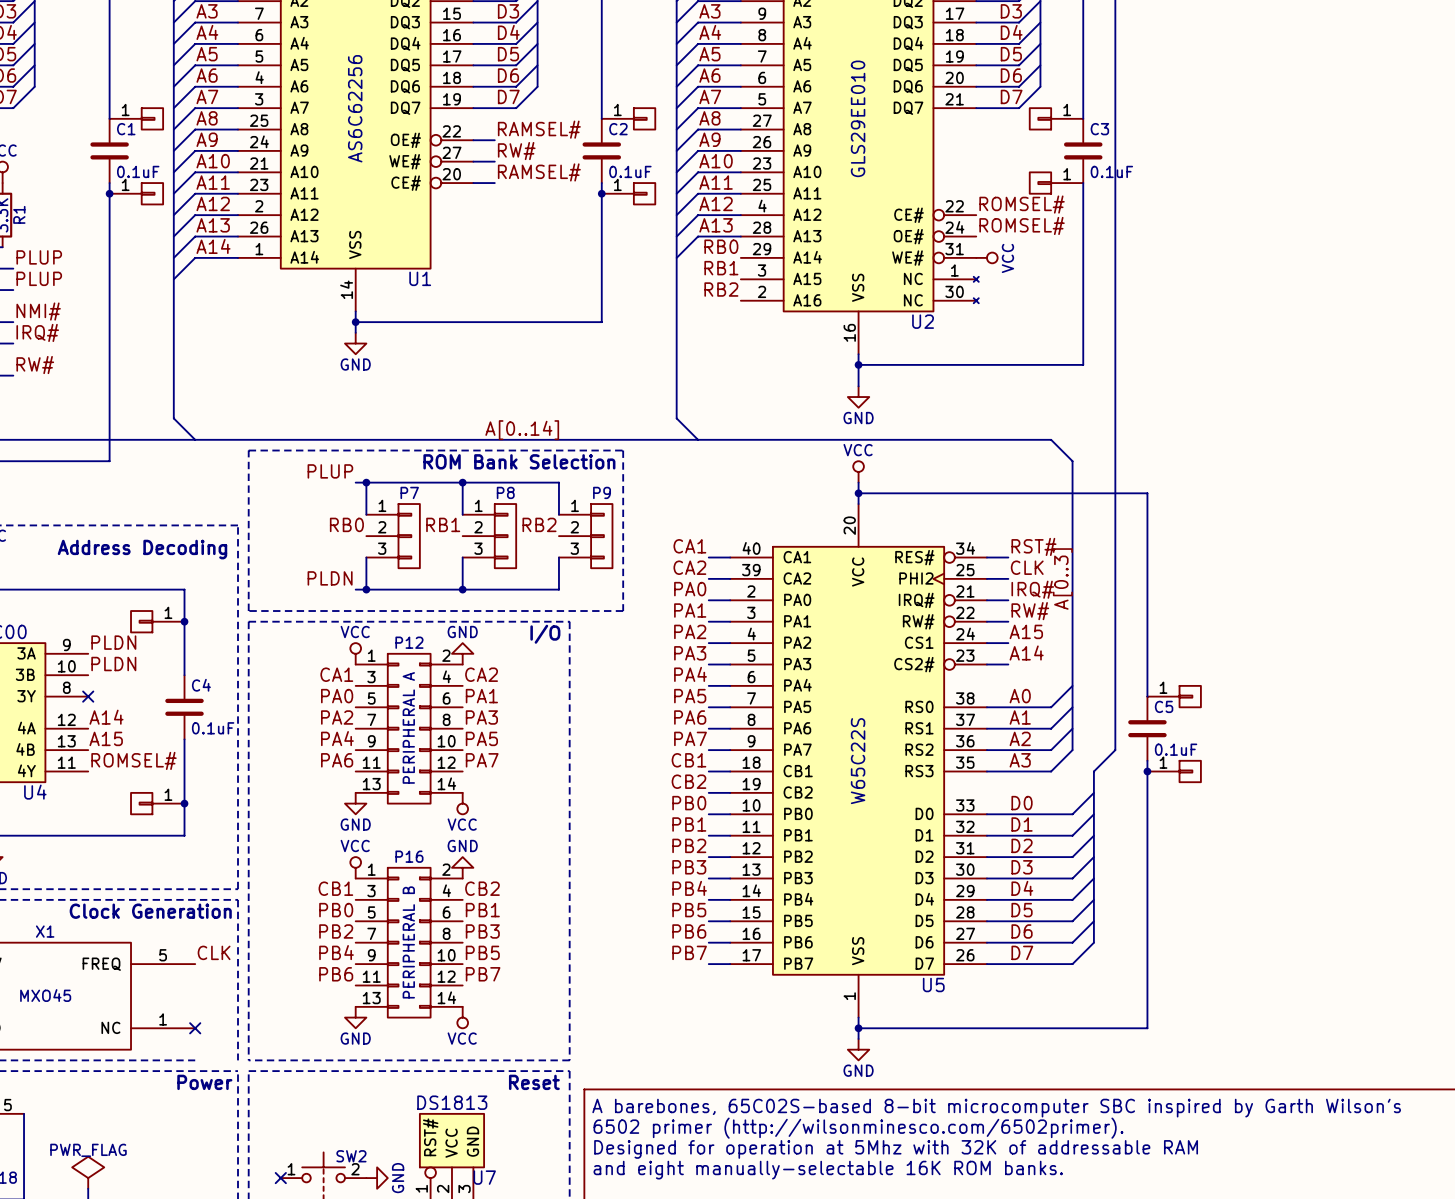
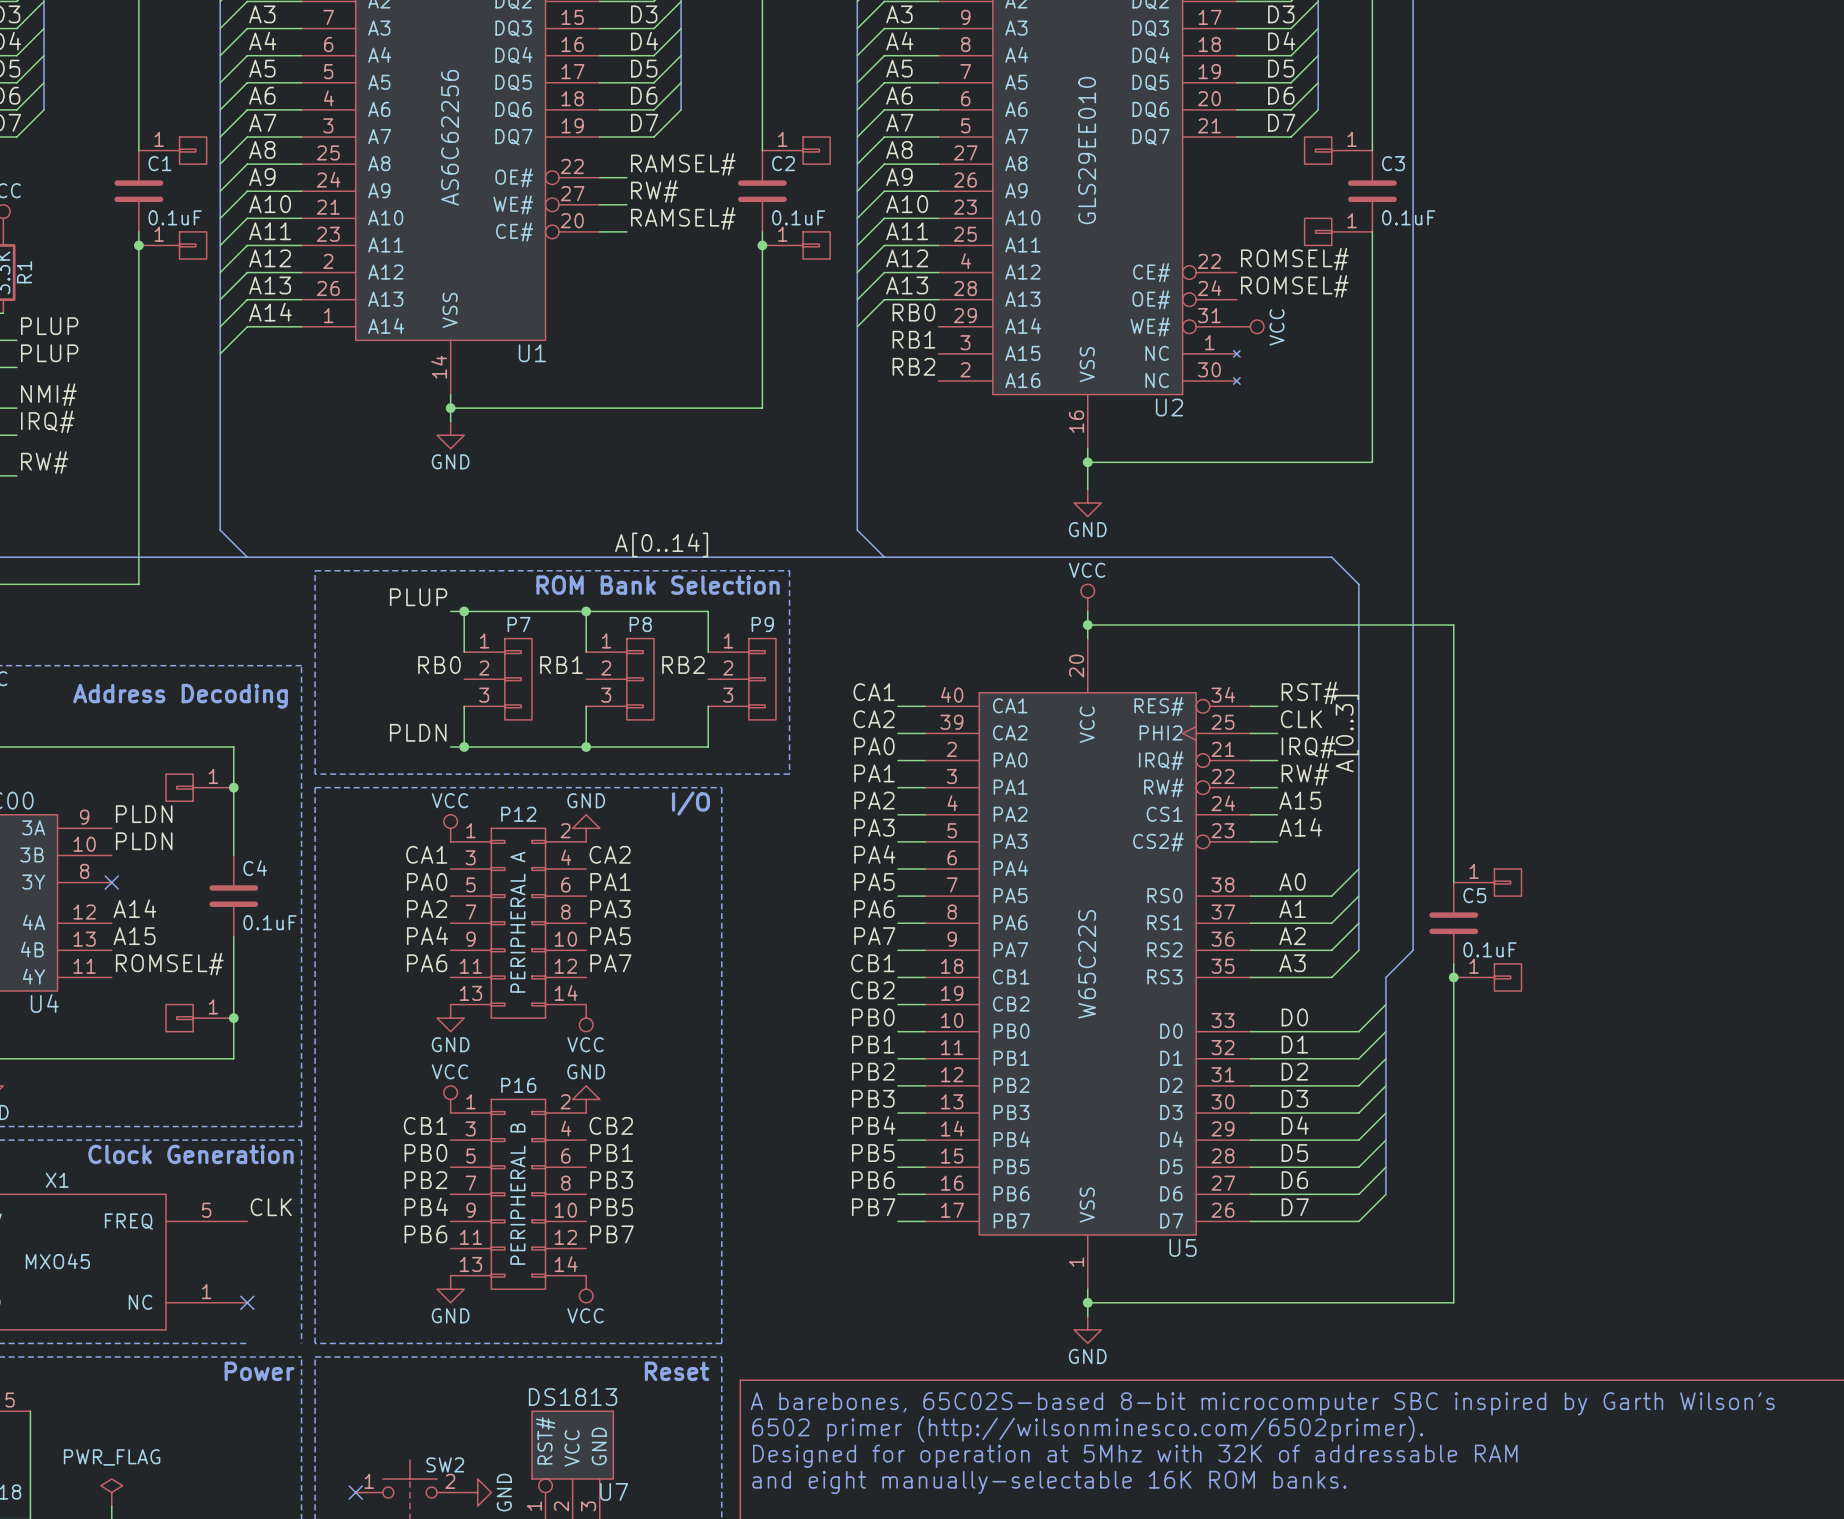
power symbol shape: [72, 1156, 105, 1189] -> [100, 1478, 123, 1507]

